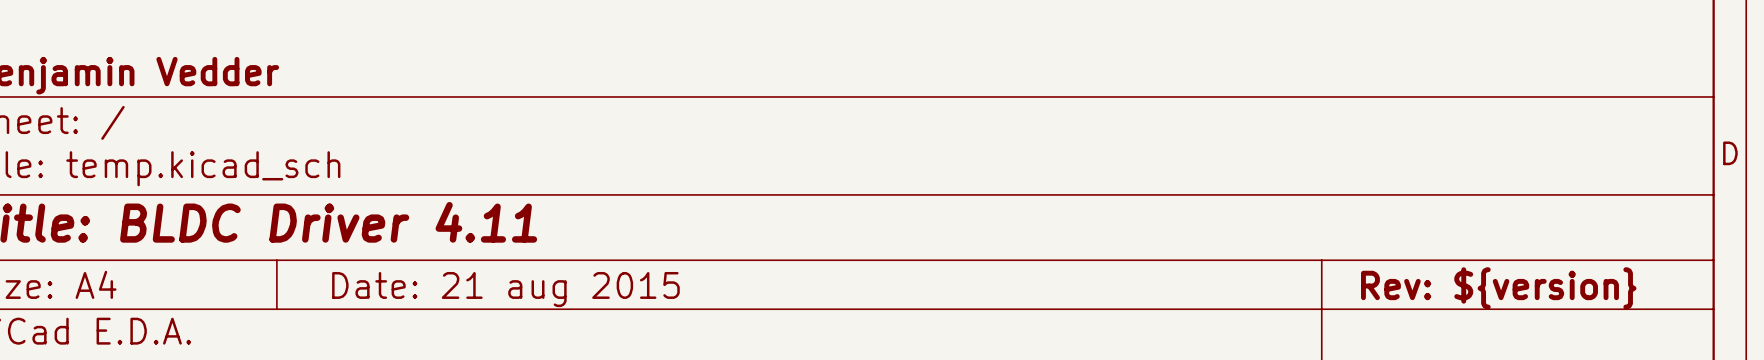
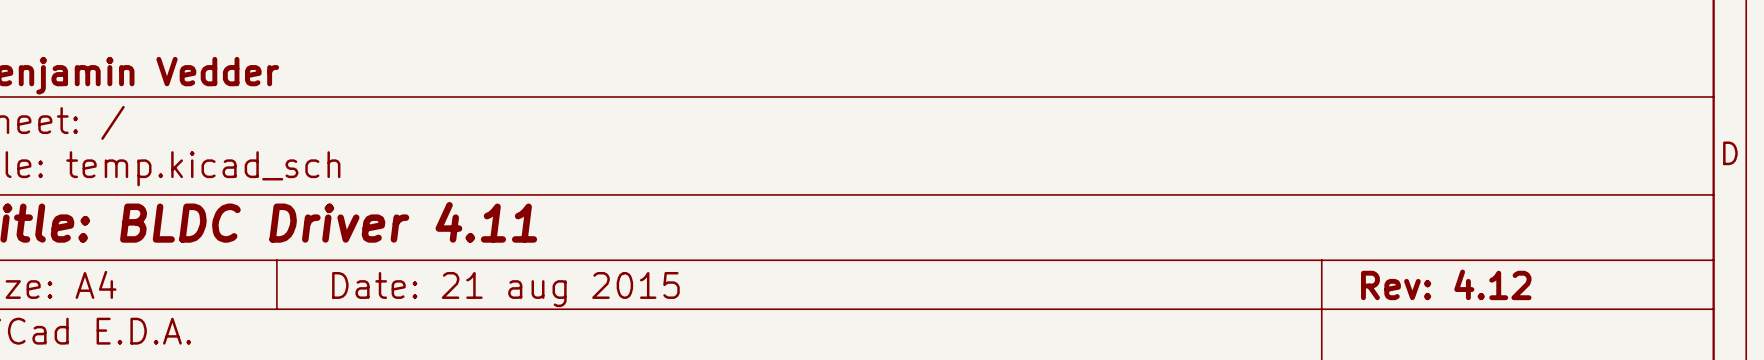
title block: Rev: ${version} (1498, 288) -> Rev: 4.12 (1446, 284)

